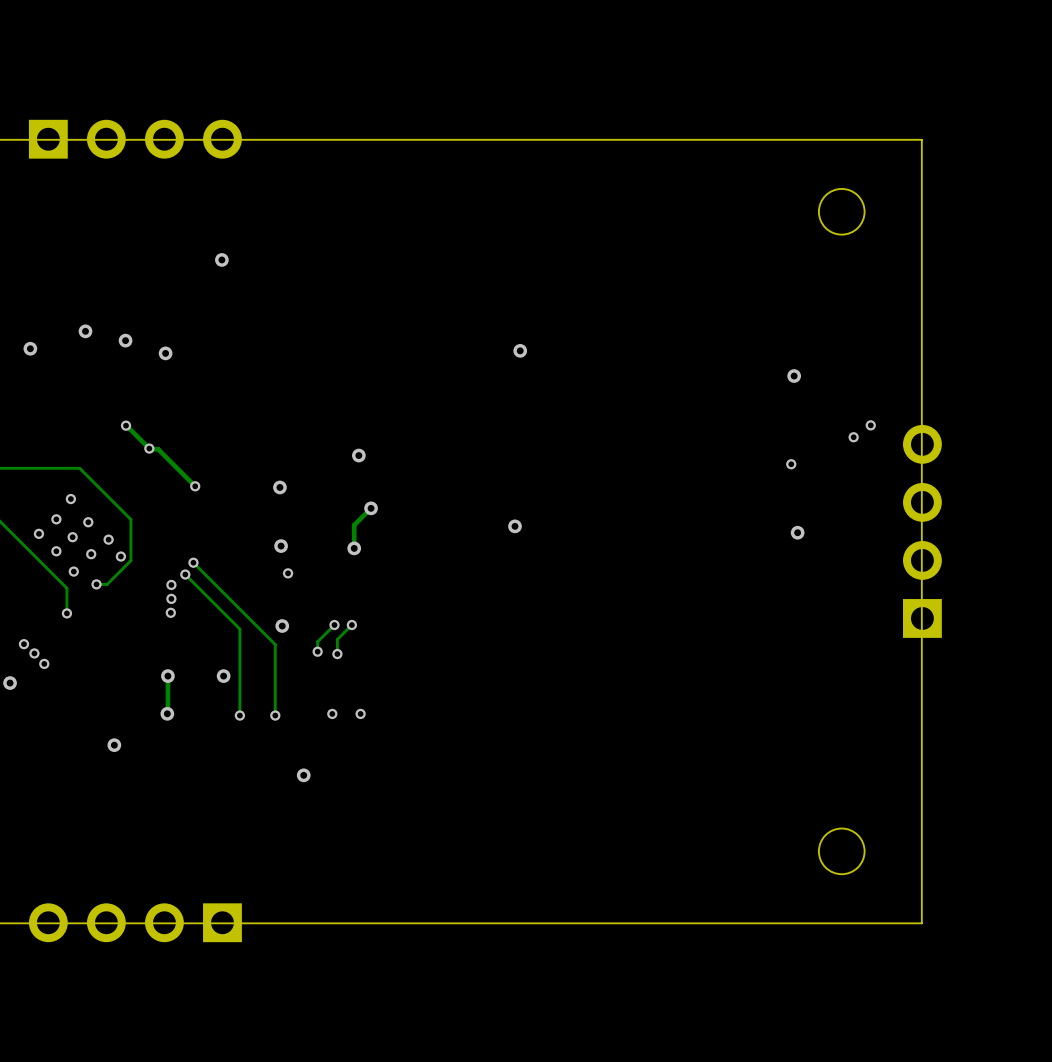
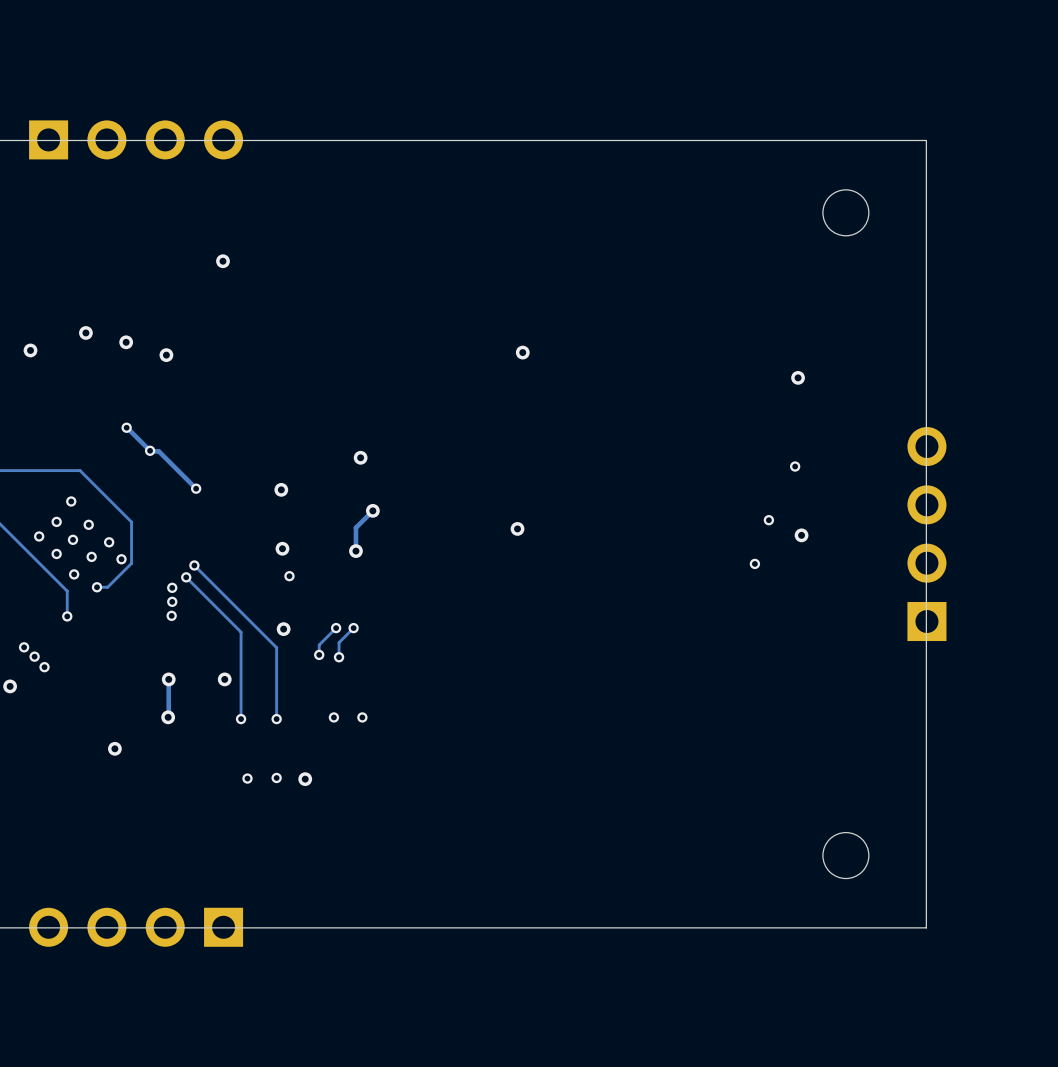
via: (870, 425) -> none
via: (853, 437) -> none
via: none -> (768, 520)
via: none -> (754, 563)
via: none -> (247, 778)
via: none -> (276, 777)

